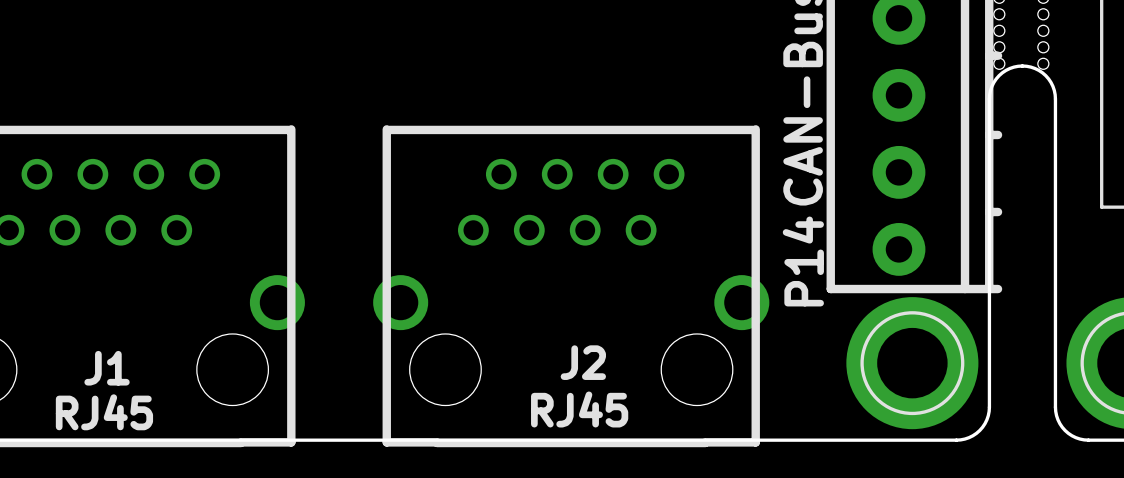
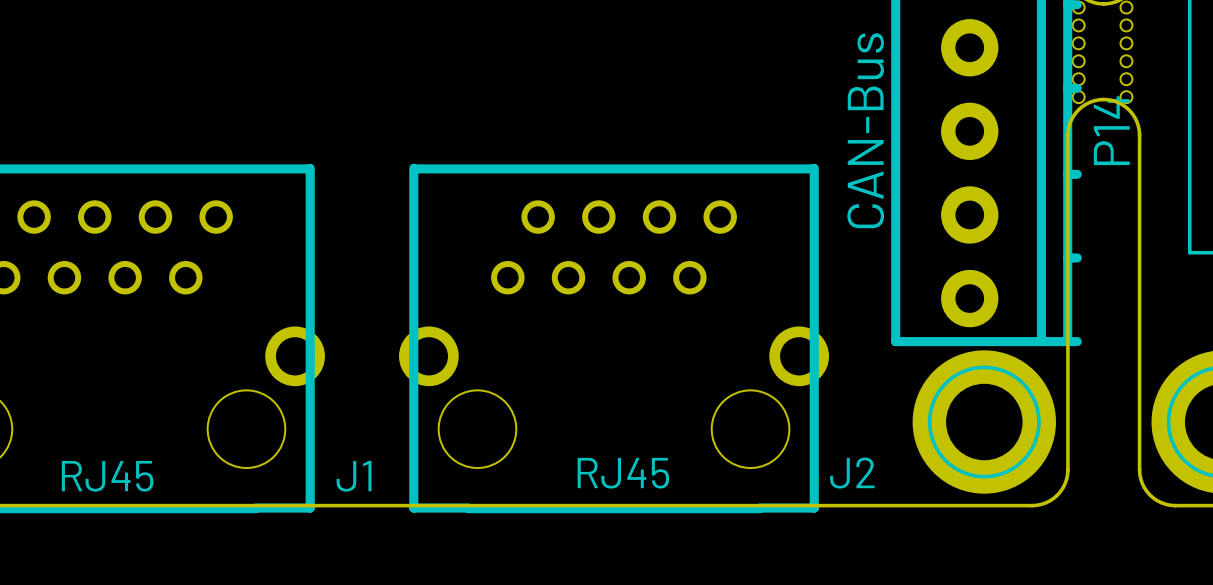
P14 name position: P14 (803, 261) -> P14 (1111, 130)
J2 name position: J2 (583, 362) -> J2 (852, 473)
J1 name position: J1 (107, 368) -> J1 (354, 476)

